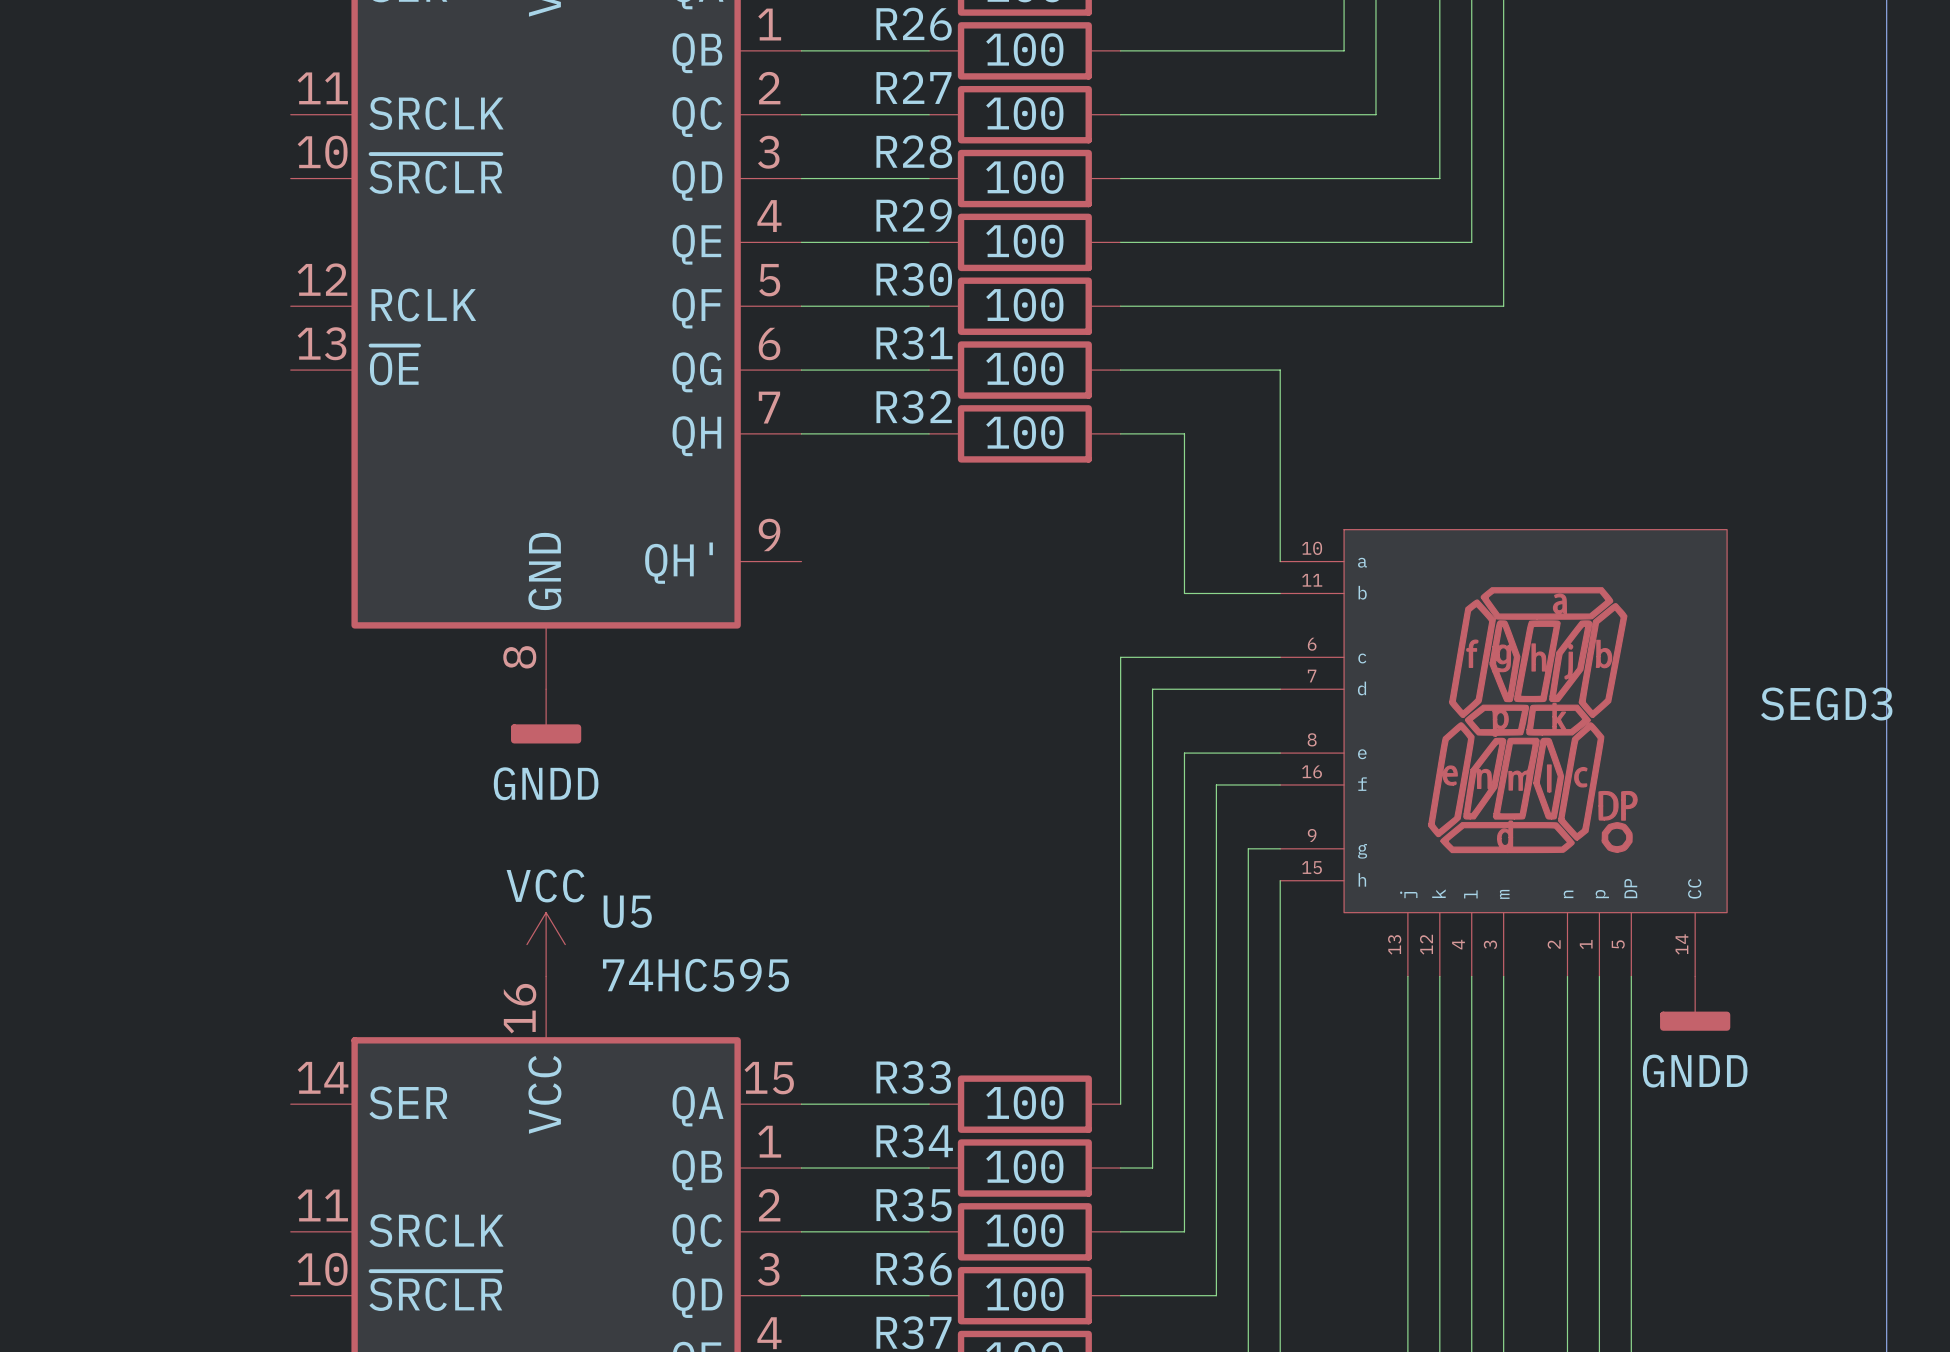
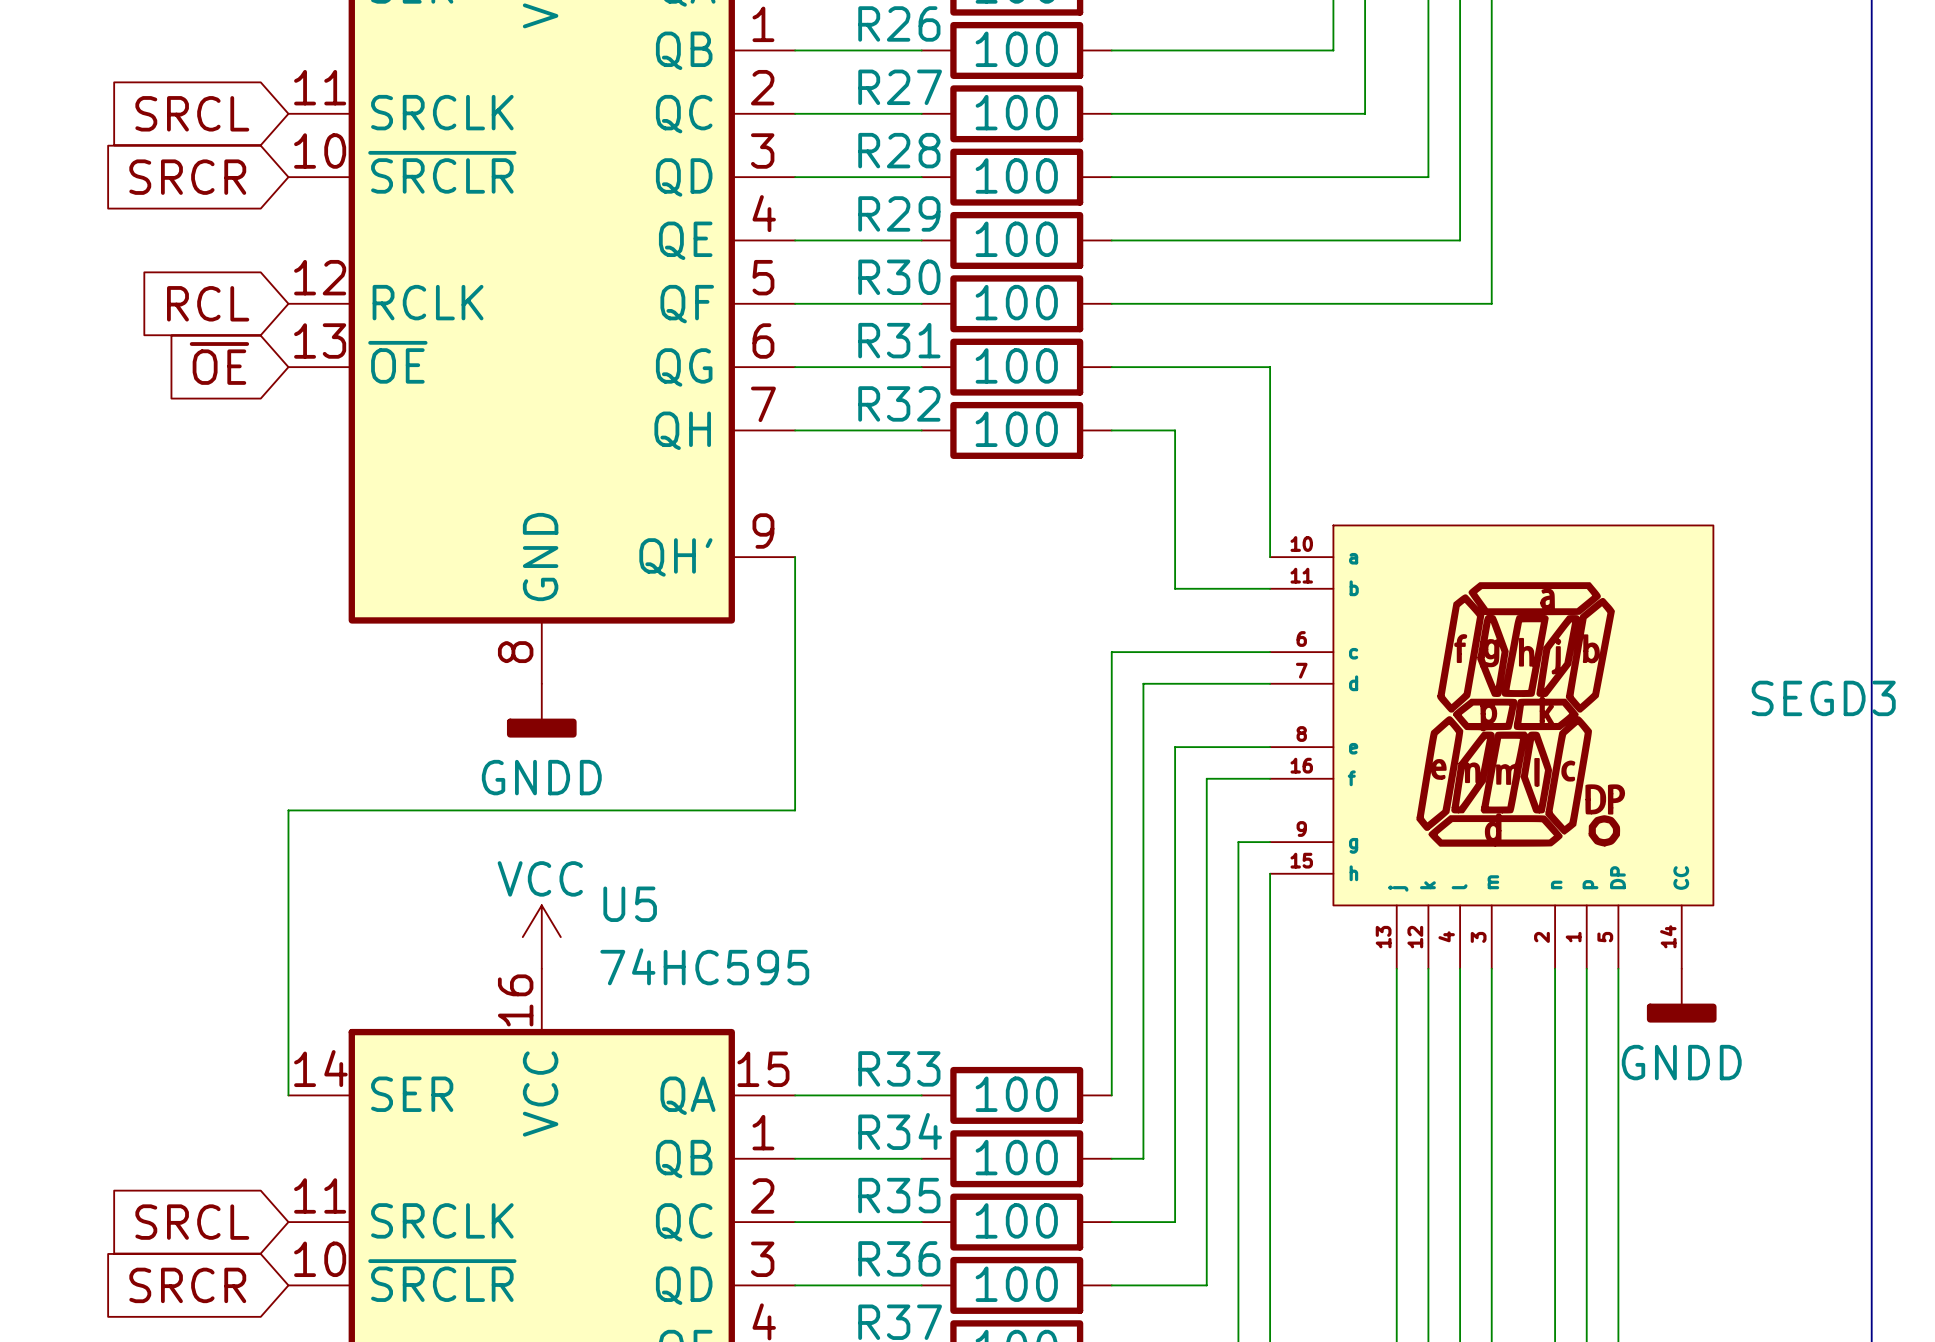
global label: none -> SRCL (192, 113)
global label: none -> SRCR (187, 177)
global label: none -> RCL (208, 303)
global label: none -> ~{OE} (219, 363)
wire: none -> (795, 557) (795, 810) (288, 810) (288, 1095)
global label: none -> SRCL (192, 1222)
global label: none -> SRCR (187, 1285)

